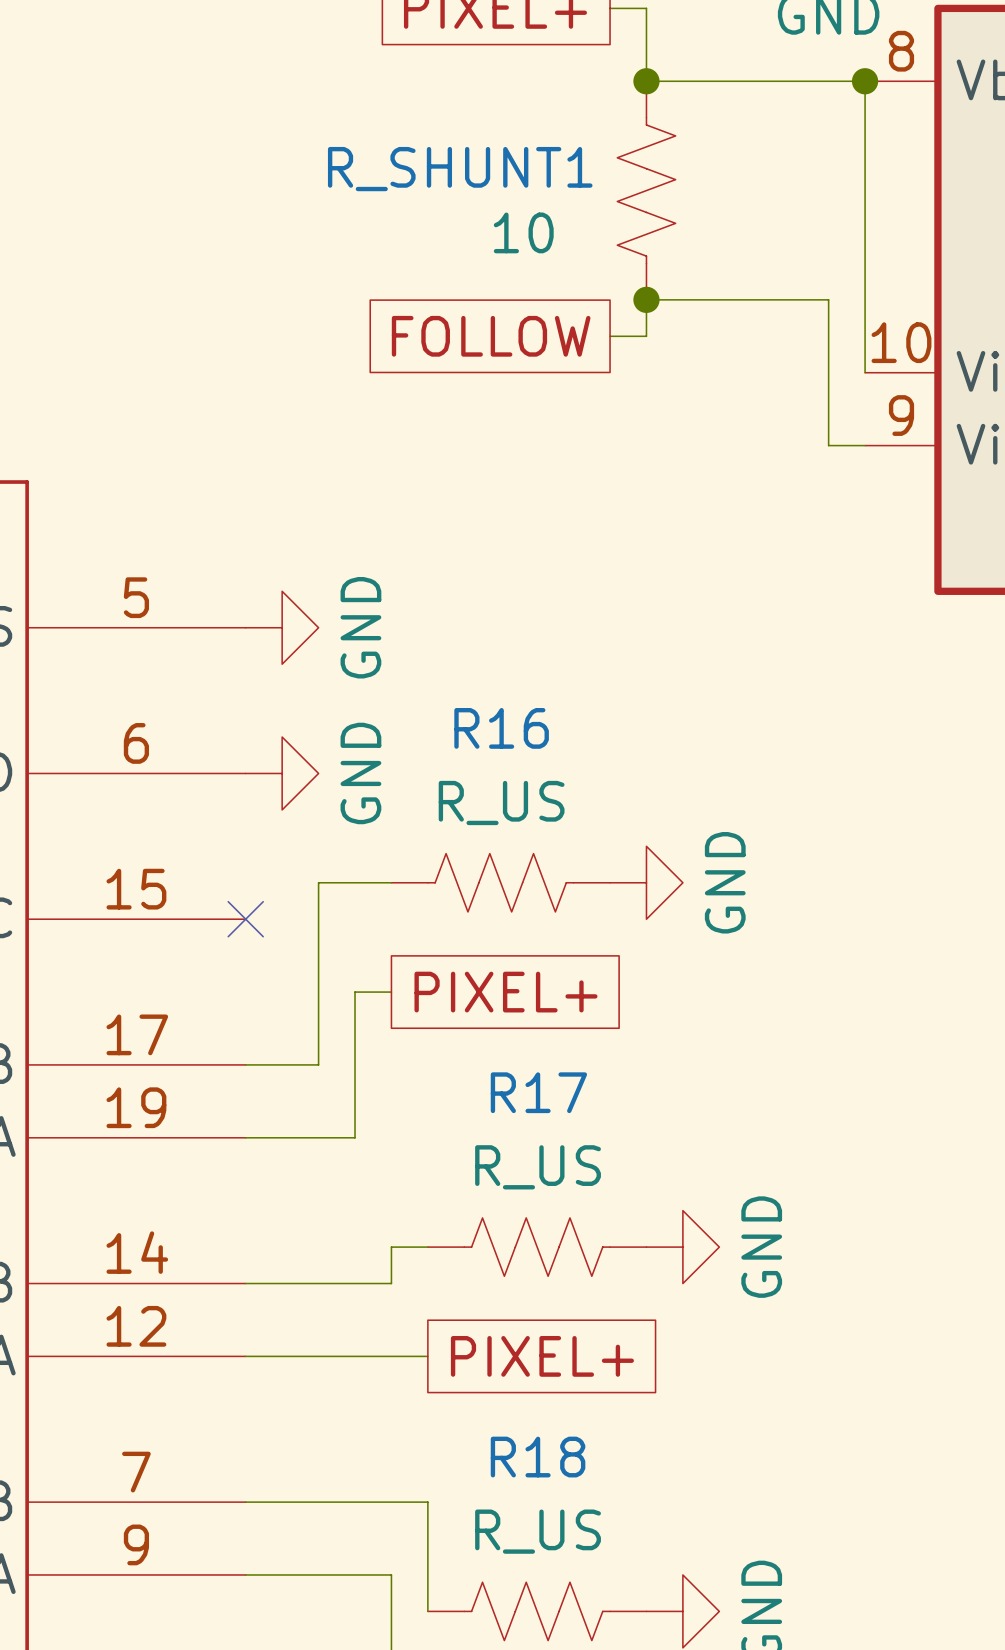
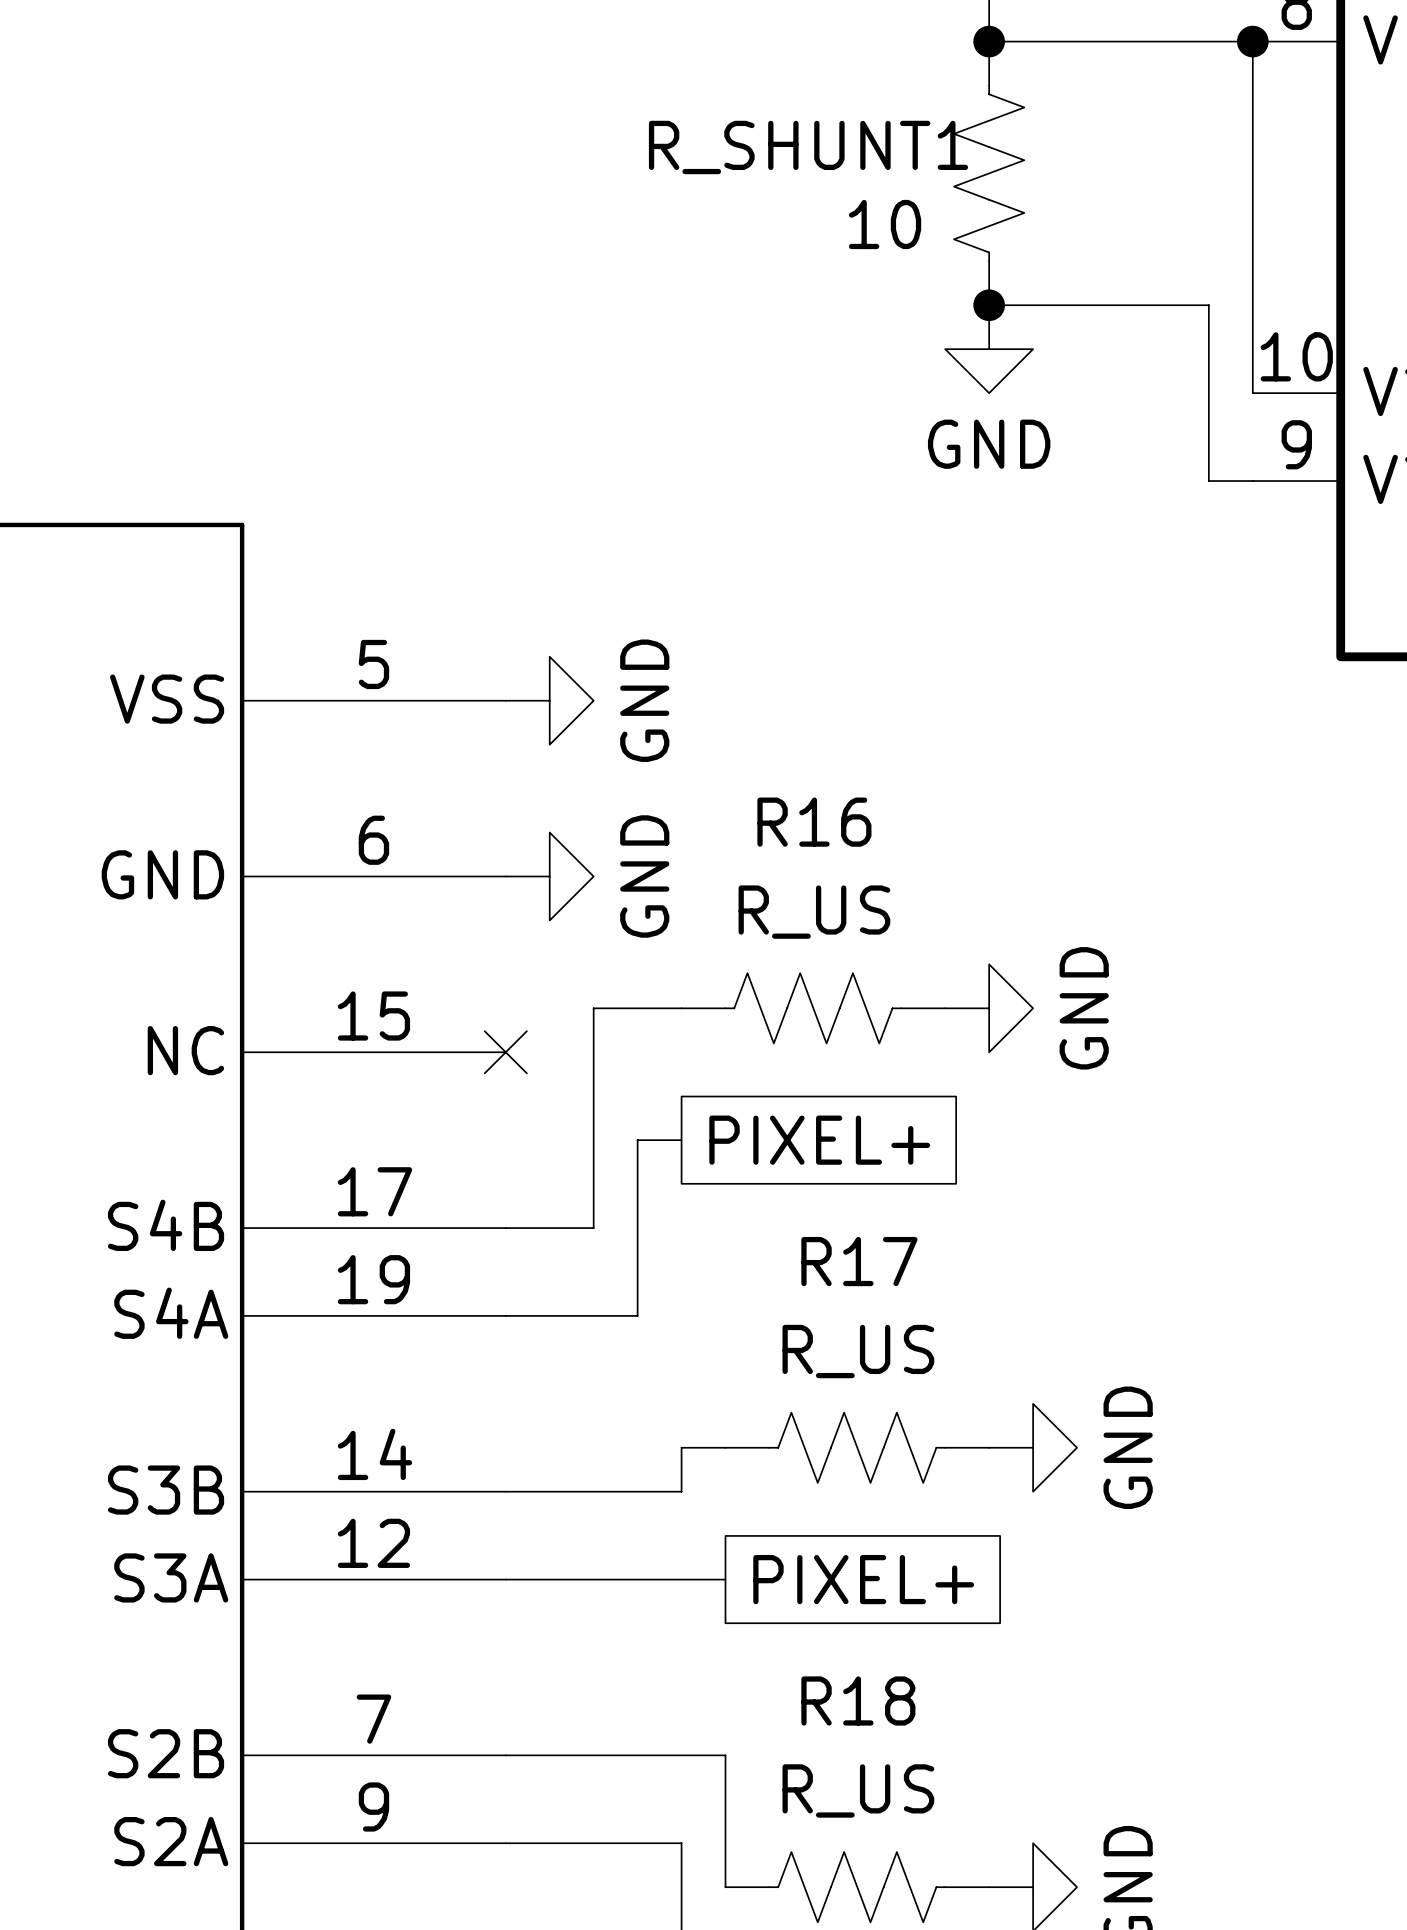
R_SHUNT1 name position: R_SHUNT1 (460, 169) -> R_SHUNT1 (808, 147)
R_SHUNT1 value position: 10 (523, 232) -> 10 (885, 224)
global label: FOLLOW (491, 336) -> none
power symbol: none -> GND (989, 349)

